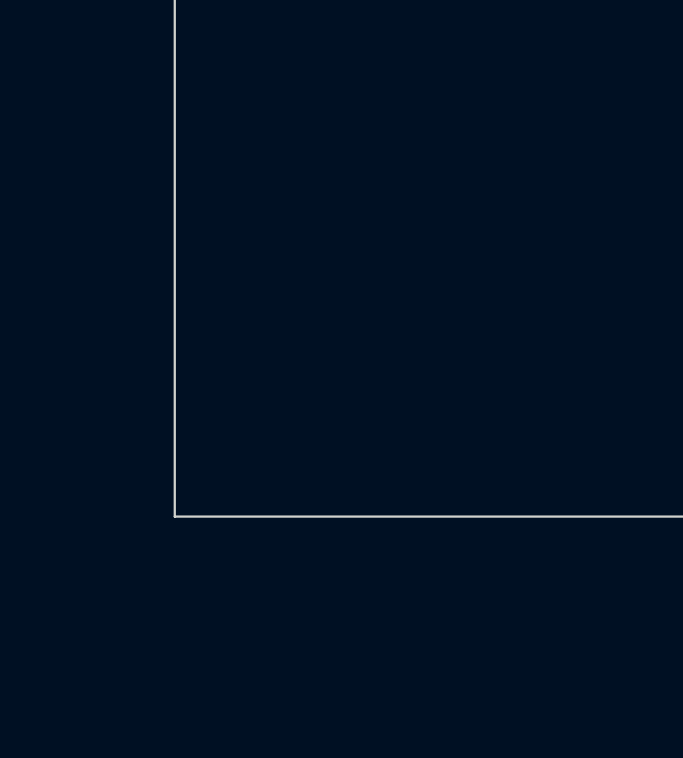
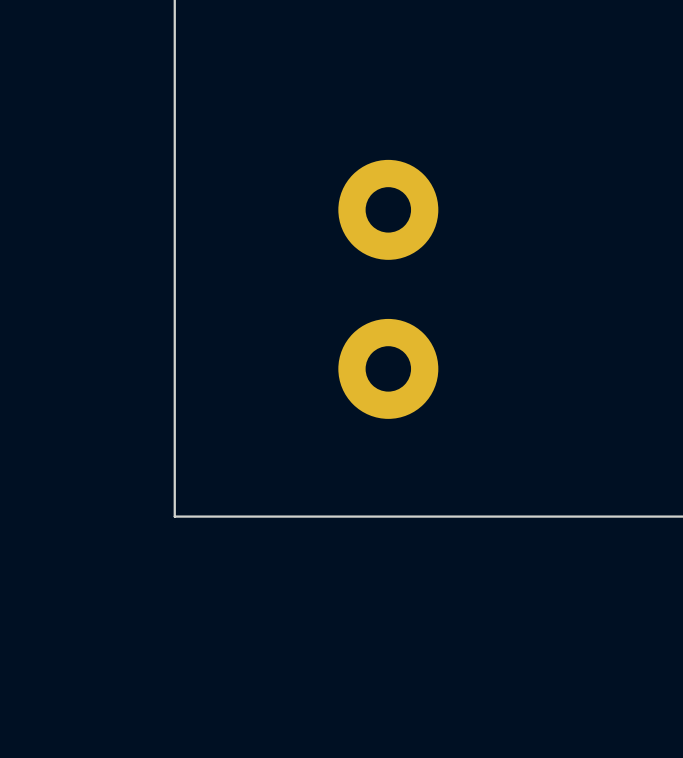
part: none -> (388, 289)

